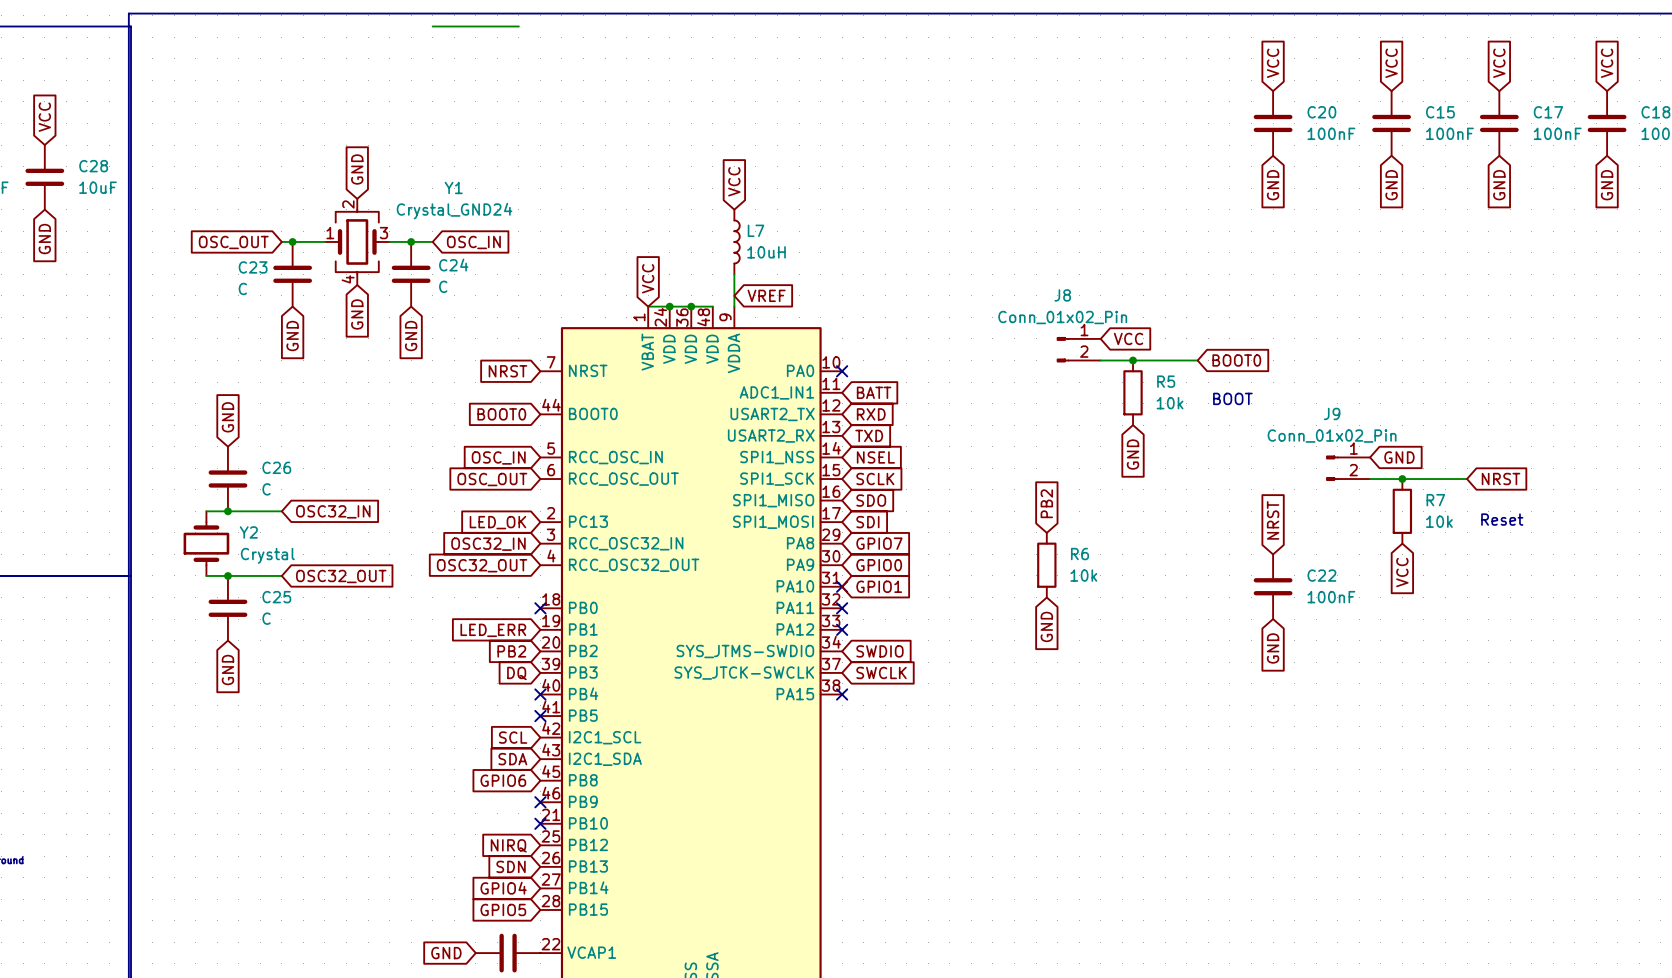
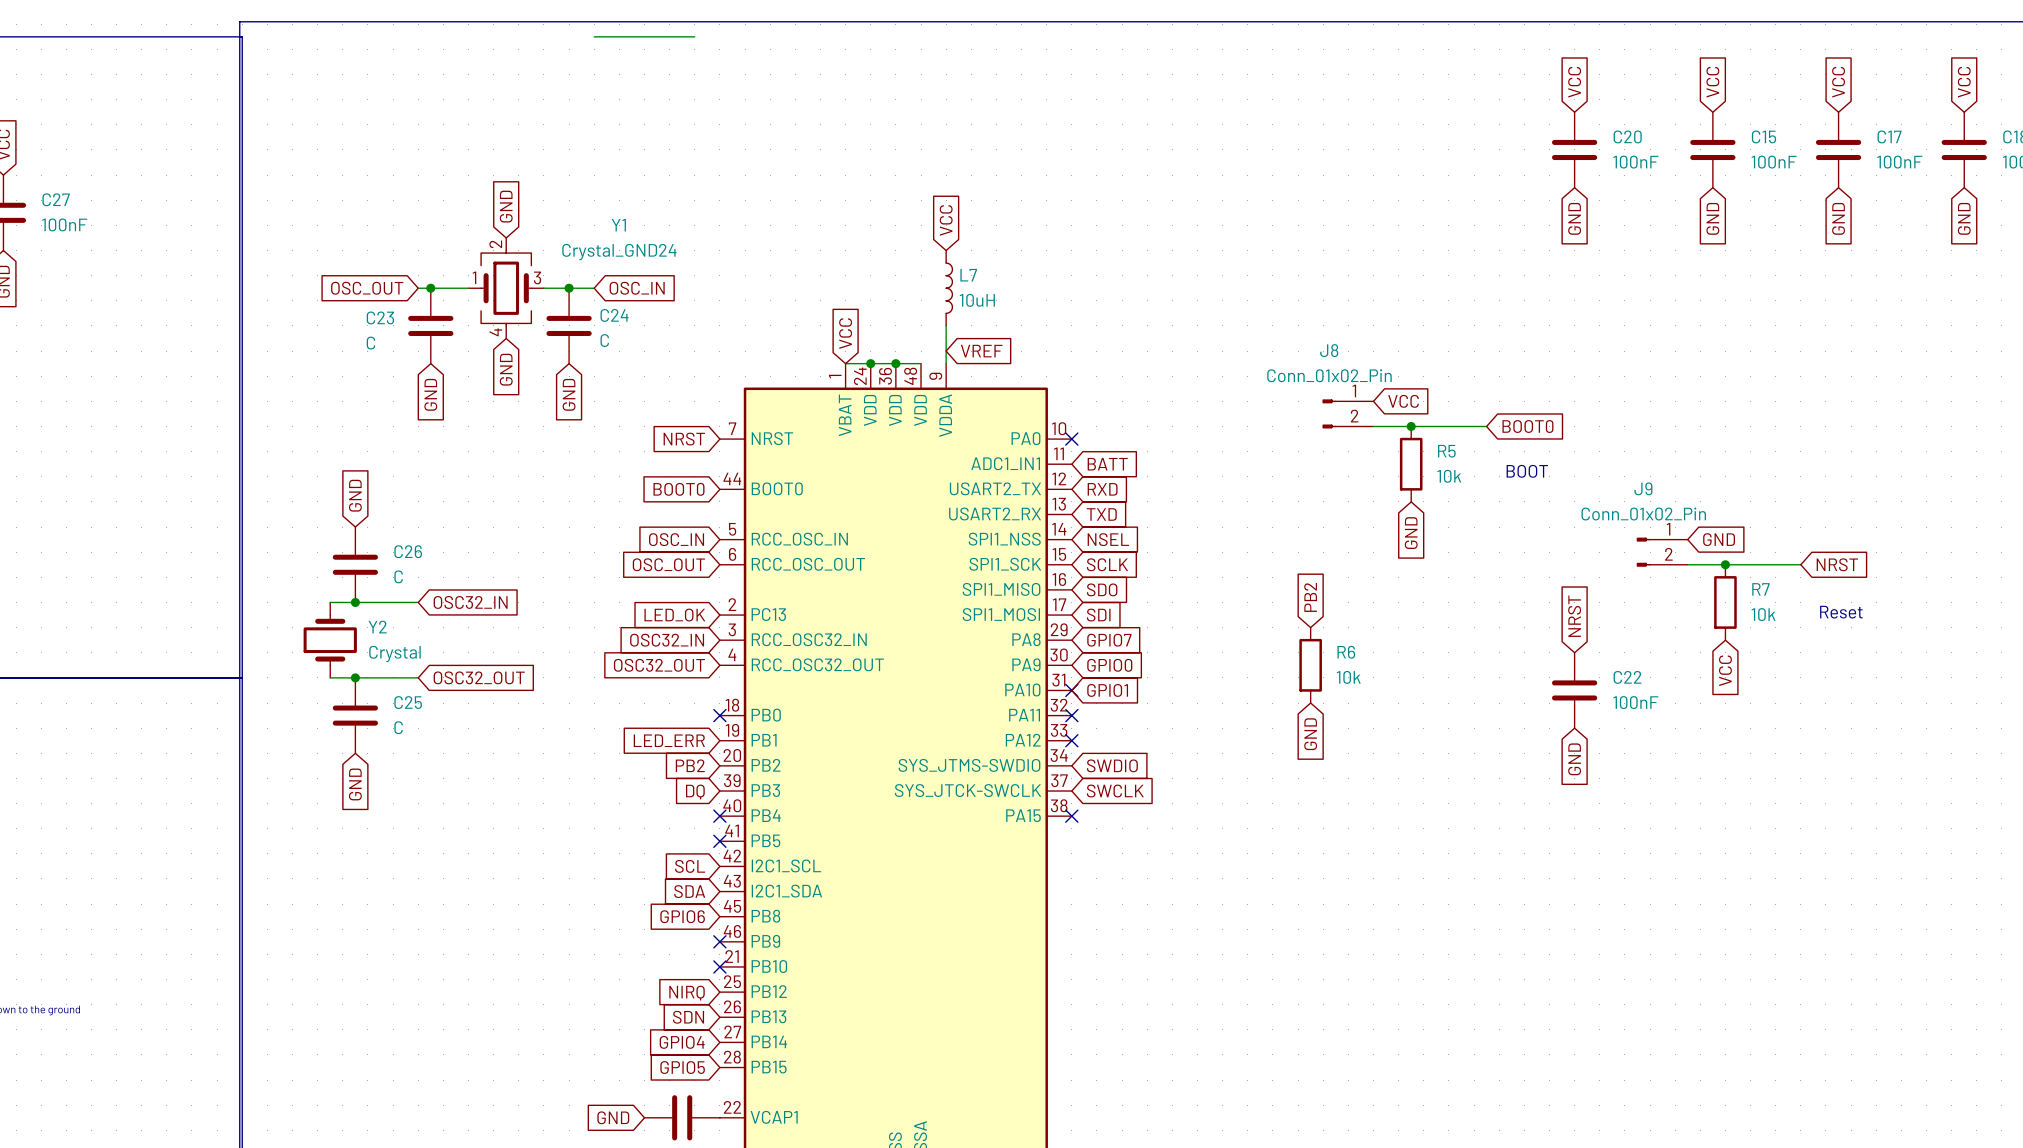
global label: VCC (44, 117) -> none
C28: 10uF (44, 177) -> none
global label: GND (44, 239) -> none

